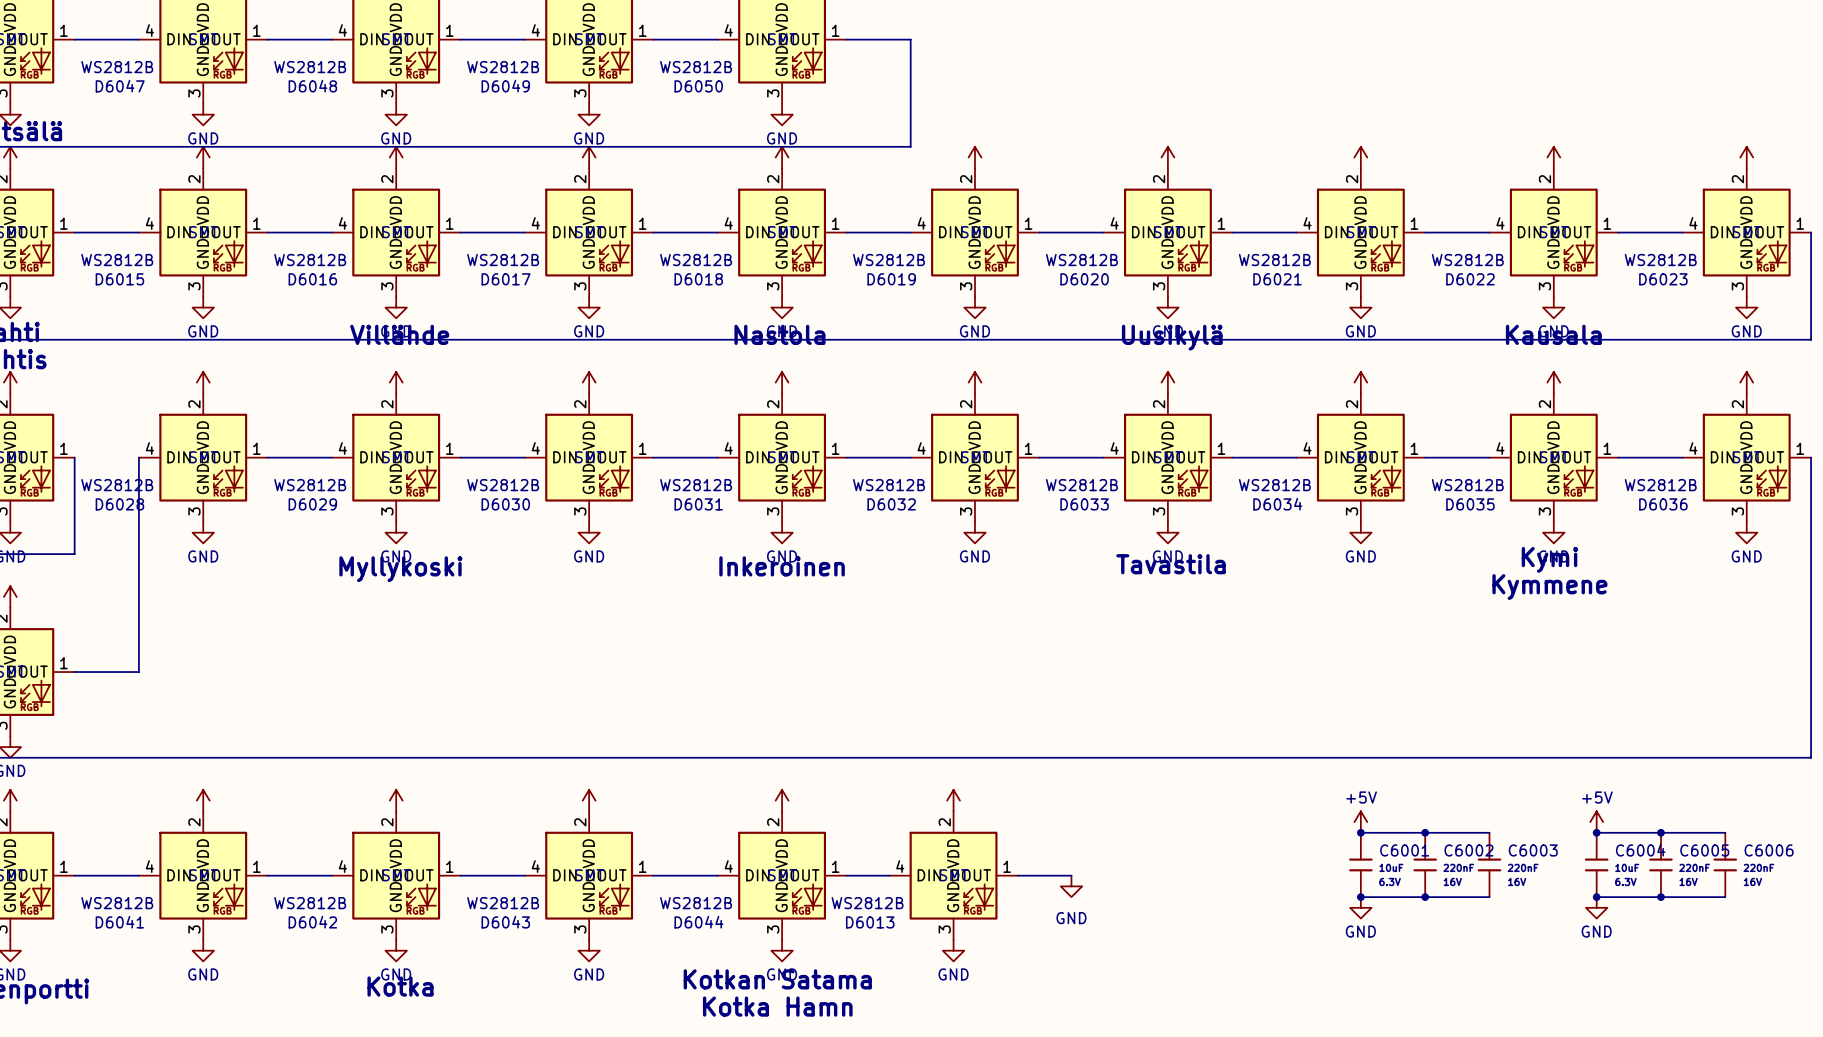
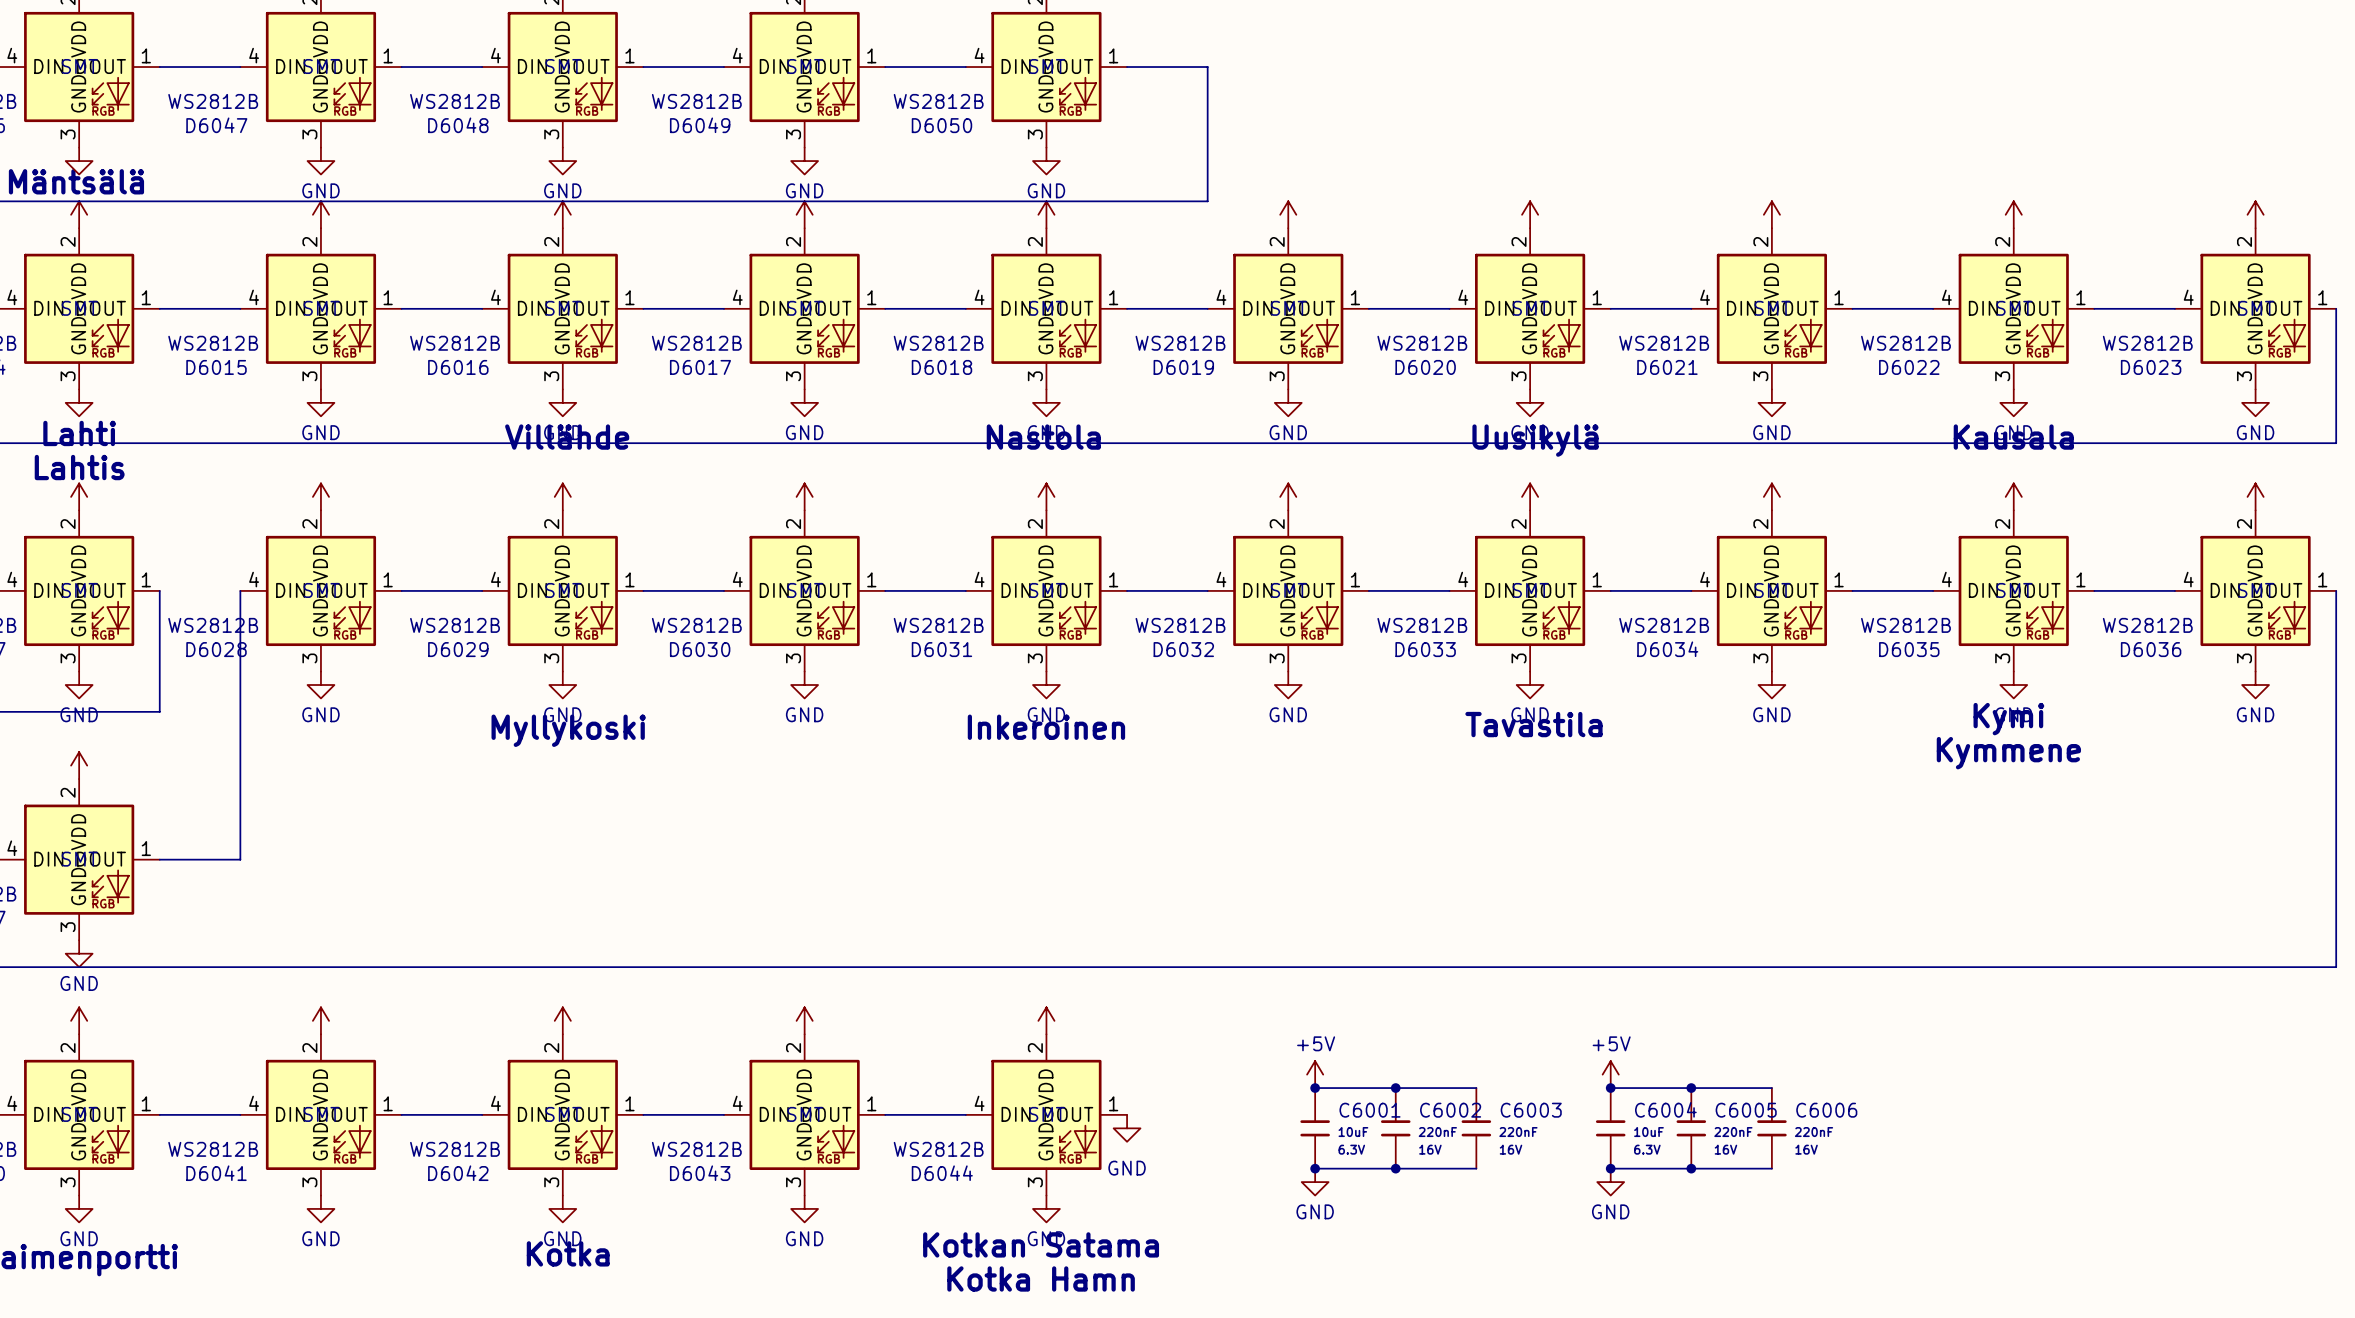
power symbol: (953, 800) -> none
power symbol position: +5V (1360, 822) -> +5V (1610, 1074)
power symbol: +5V (1596, 822) -> none
wire: (1360, 832) (1489, 832) -> (1610, 1088) (1771, 1088)
junction: (1360, 832) -> none
junction: (1425, 832) -> none
wire: (1596, 832) (1725, 832) -> none
junction: (1596, 832) -> none
junction: (1660, 832) -> none
power symbol: none -> +5V (1315, 1074)
wire: none -> (1315, 1088) (1476, 1088)
junction: none -> (1315, 1088)
junction: none -> (1395, 1088)
junction: none -> (1610, 1088)
junction: none -> (1691, 1088)
C6001 position: (1360, 864) -> (1315, 1128)
C6002 position: (1425, 864) -> (1395, 1128)
C6003 position: (1489, 864) -> (1476, 1128)
C6004 position: (1596, 864) -> (1610, 1128)
C6005 position: (1660, 864) -> (1691, 1128)
C6006 position: (1725, 864) -> (1771, 1128)
wire: (846, 875) (889, 875) -> none
D6013: WS2812B (953, 875) -> none
wire: (1017, 875) (1071, 875) -> none
power symbol: none -> GND (1127, 1128)
power symbol: GND (1071, 886) -> none
wire: (1360, 897) (1489, 897) -> (1610, 1168) (1771, 1168)
junction: (1360, 897) -> none
junction: (1425, 897) -> none
wire: (1596, 897) (1725, 897) -> none
junction: (1596, 897) -> none
junction: (1660, 897) -> none
power symbol: GND (1360, 907) -> none
power symbol: GND (1596, 907) -> none
wire: none -> (1315, 1168) (1476, 1168)
junction: none -> (1315, 1168)
junction: none -> (1395, 1168)
junction: none -> (1610, 1168)
junction: none -> (1691, 1168)
power symbol: none -> GND (1315, 1182)
power symbol: none -> GND (1610, 1182)
power symbol: GND (953, 950) -> none

